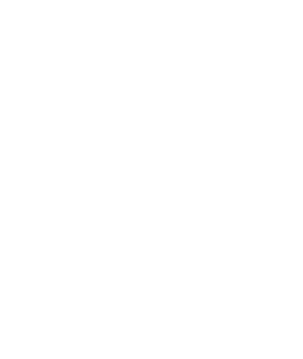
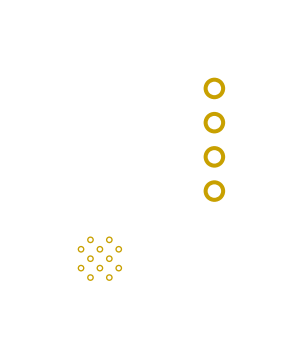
part: none -> (214, 139)
part: none -> (99, 258)

